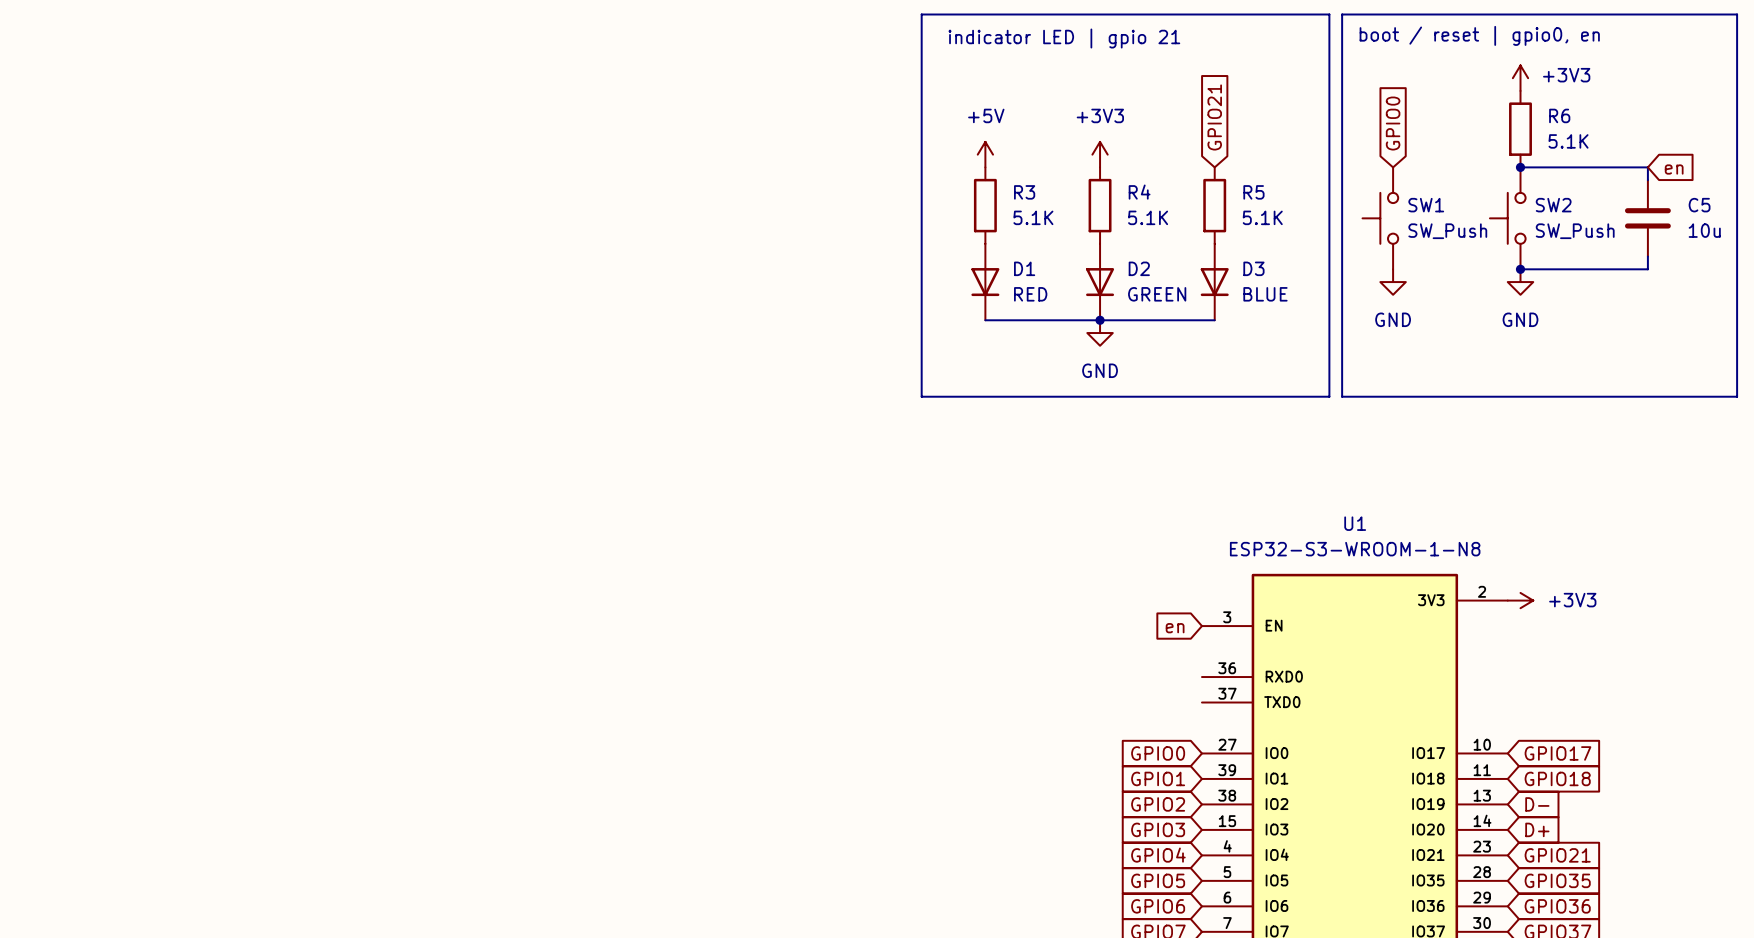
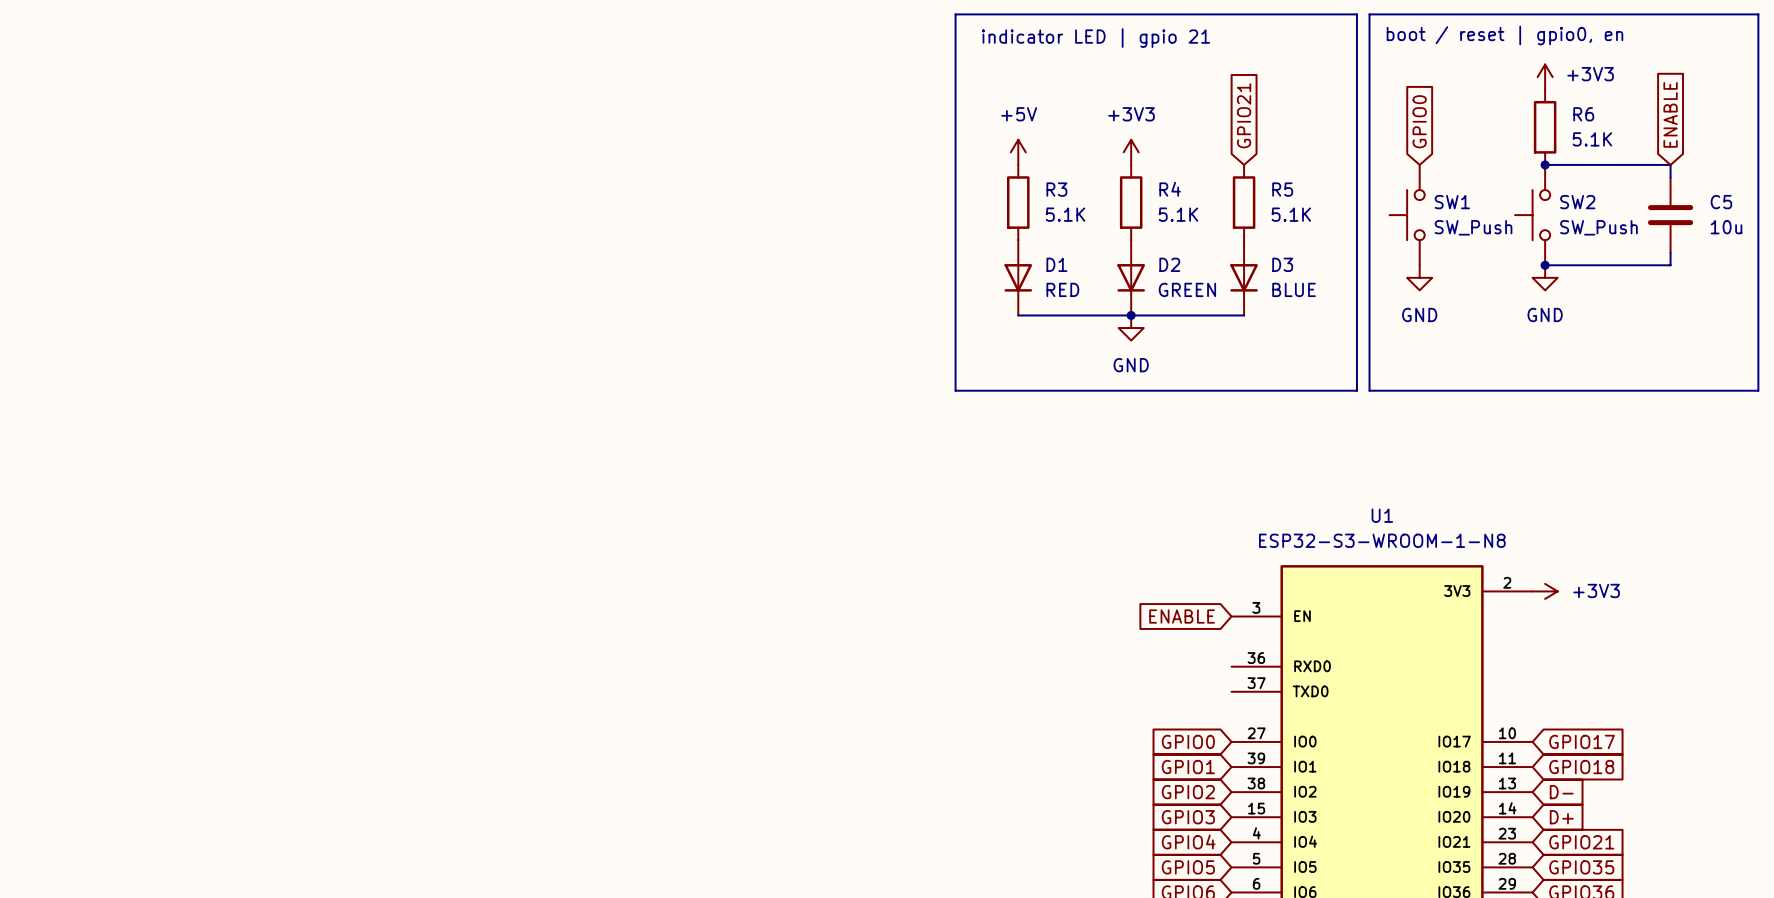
global label: en (1674, 169) -> ENABLE (1670, 114)
global label: en (1175, 628) -> ENABLE (1182, 616)

